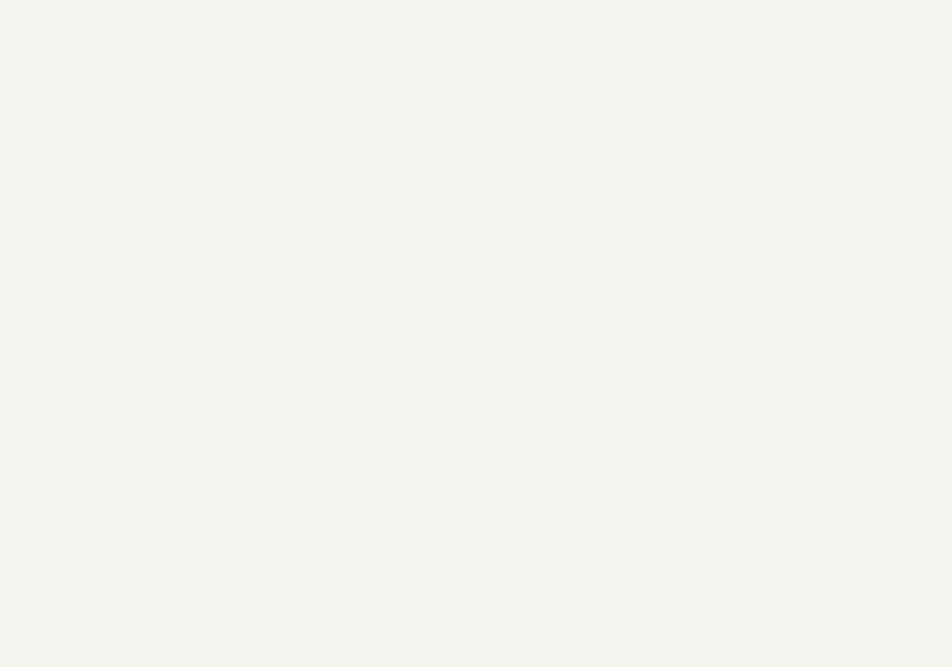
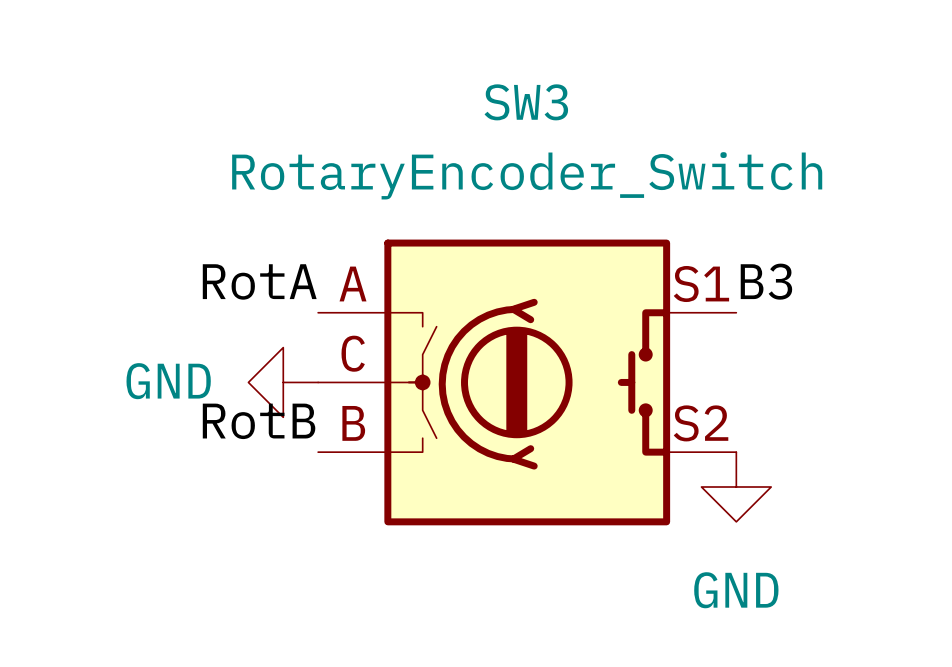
label: none -> RotA (259, 281)
label: none -> B3 (766, 281)
power symbol: none -> GND (283, 382)
SW3: none -> RotaryEncoder_Switch (527, 382)
label: none -> RotB (259, 421)
power symbol: none -> GND (736, 487)

